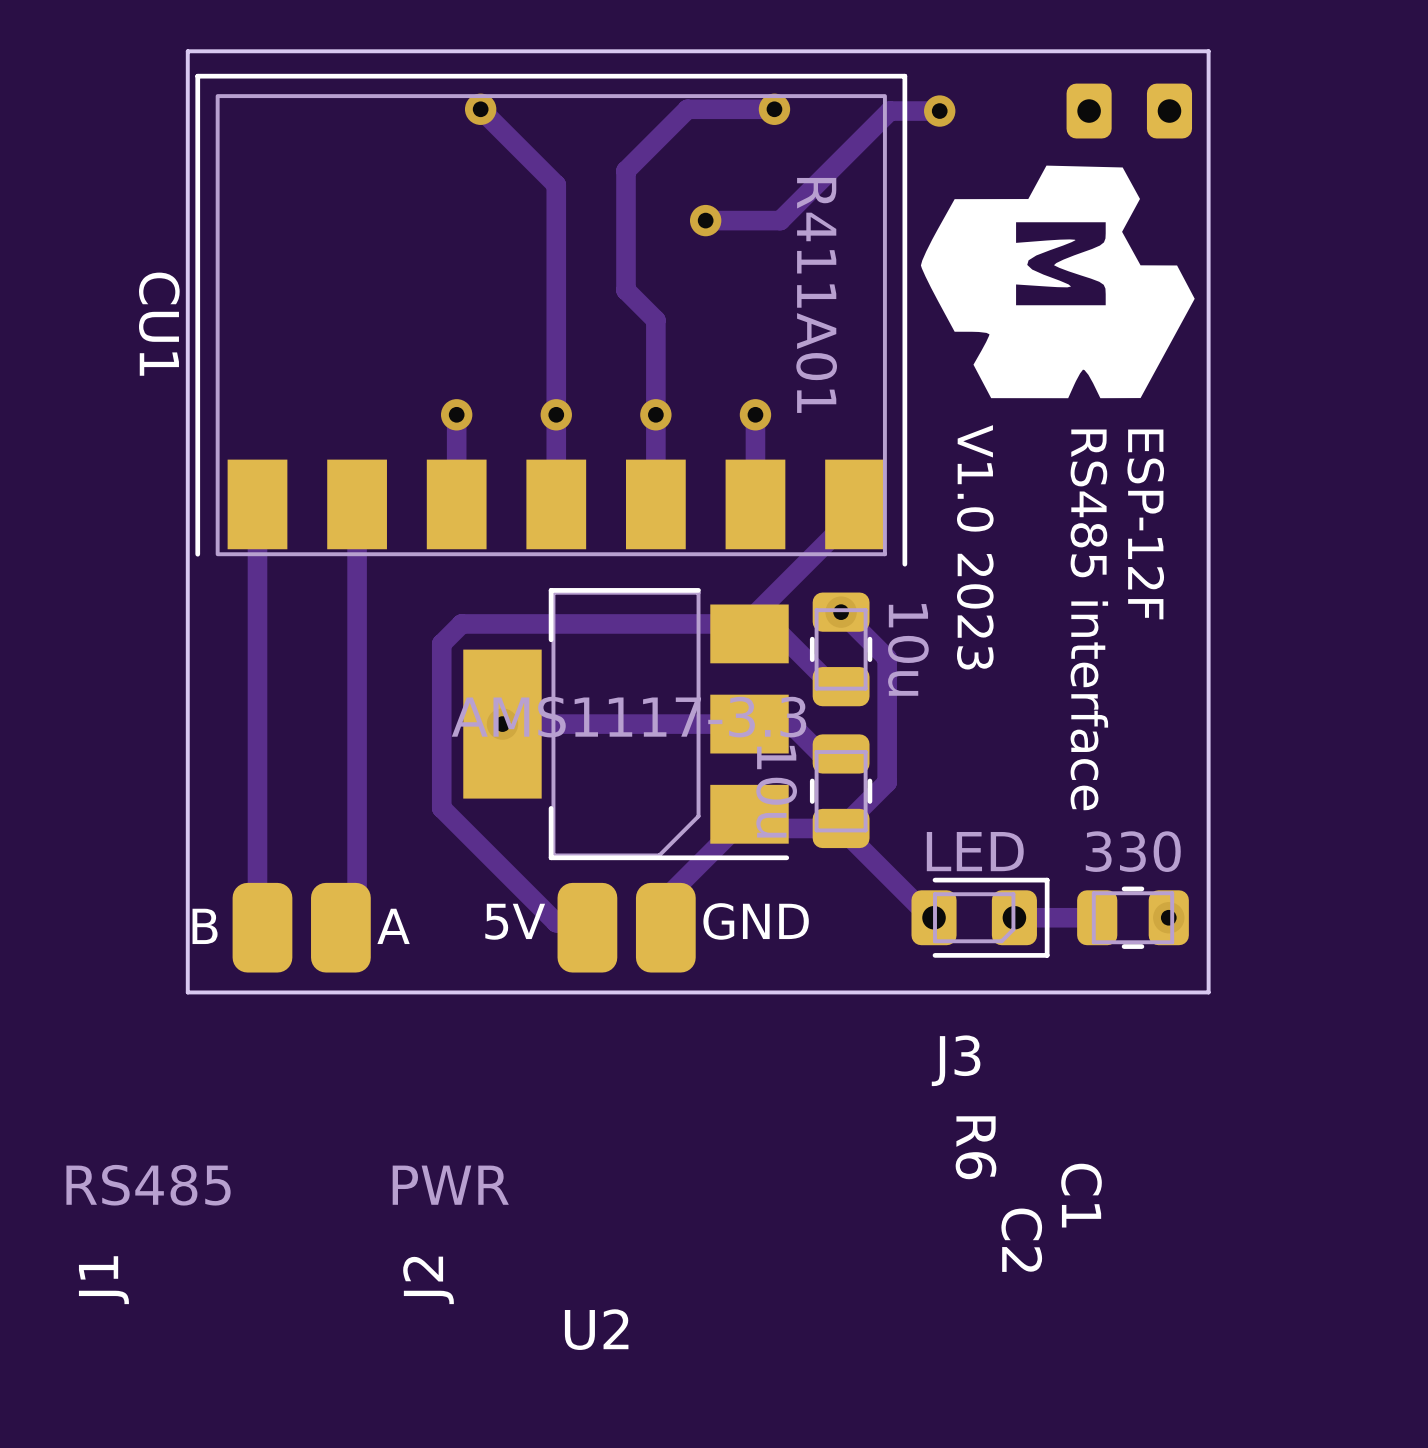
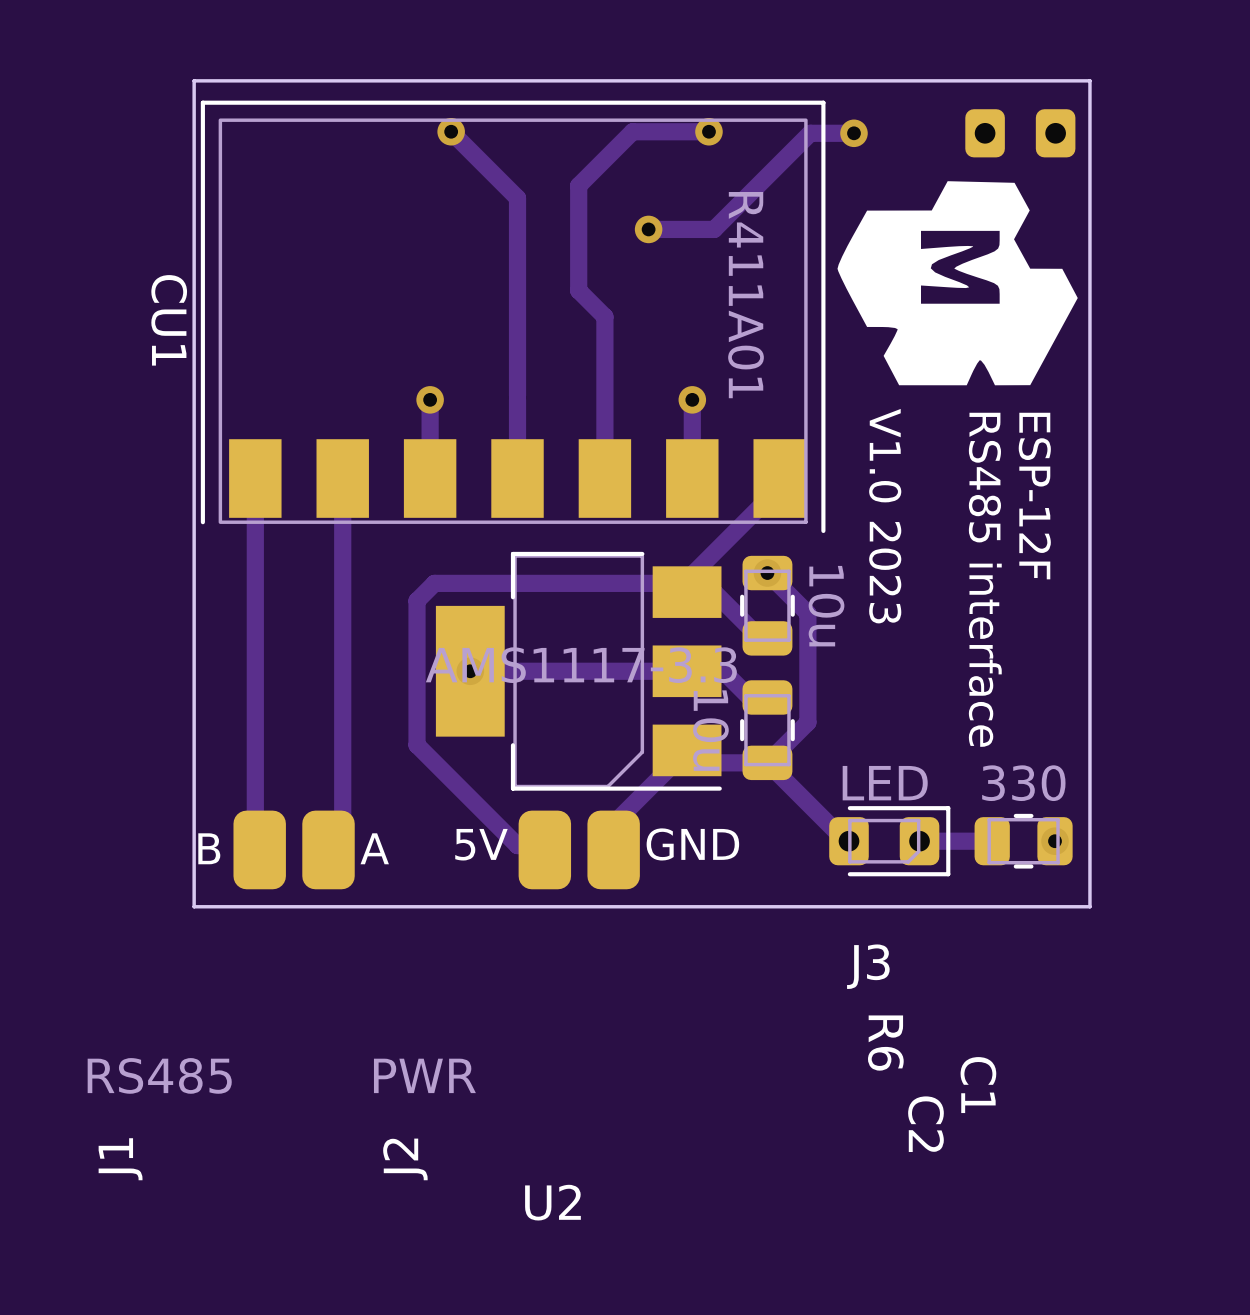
via: (556, 414) -> none
via: (655, 414) -> none

